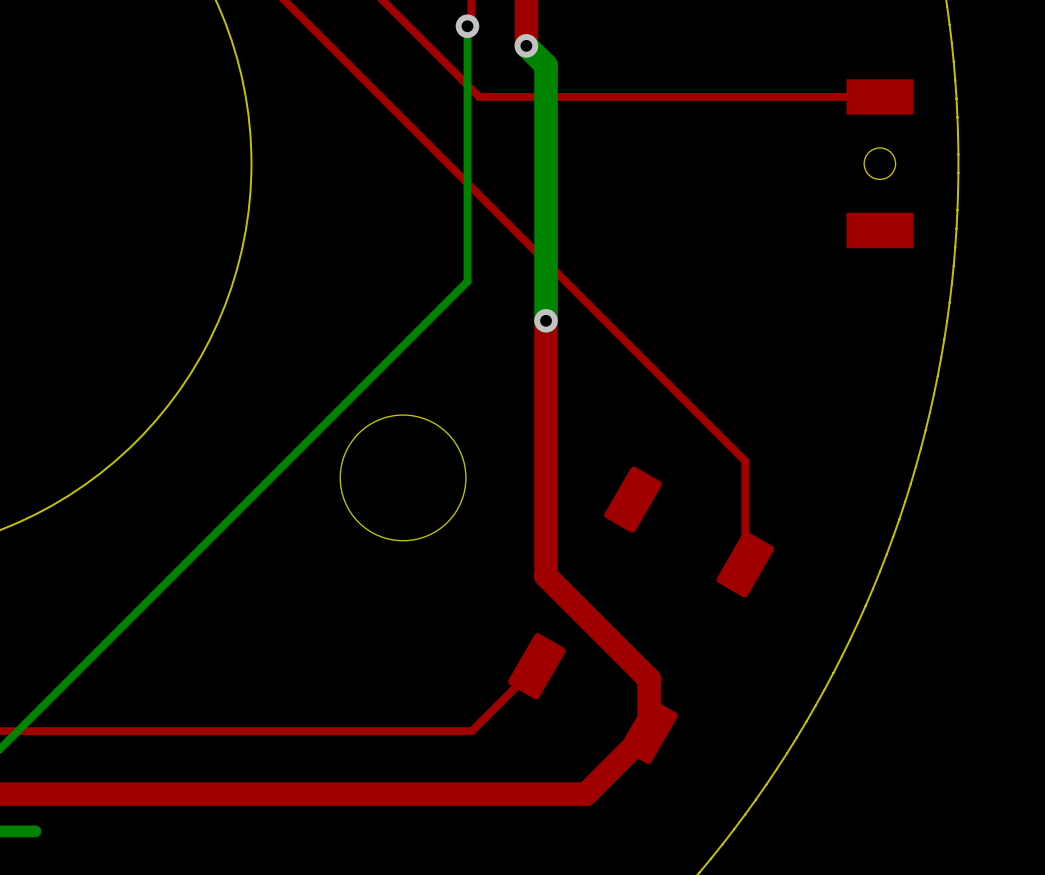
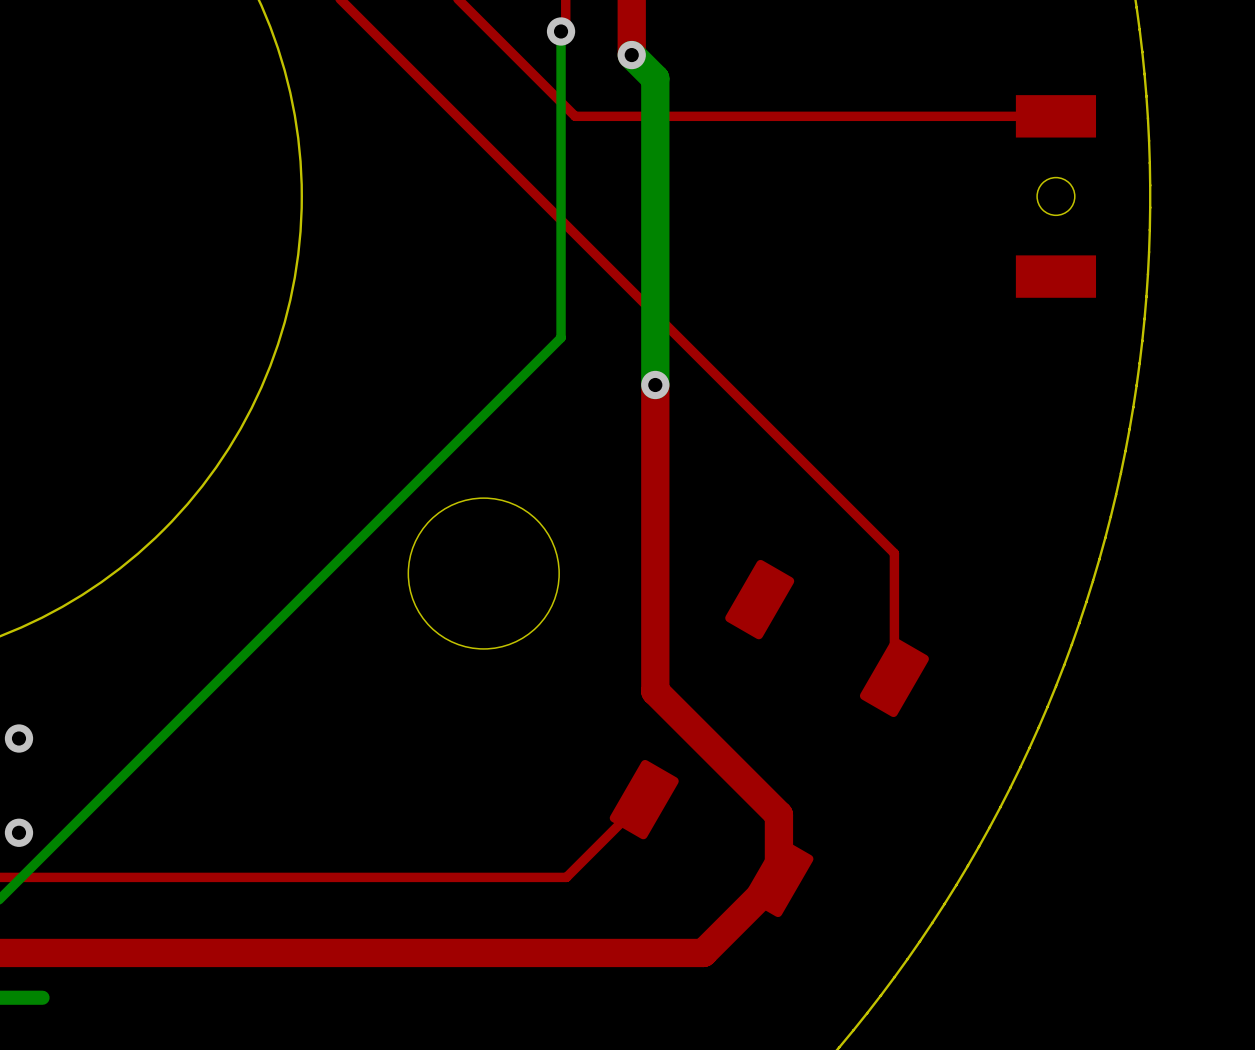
via: none -> (18, 738)
via: none -> (18, 832)

